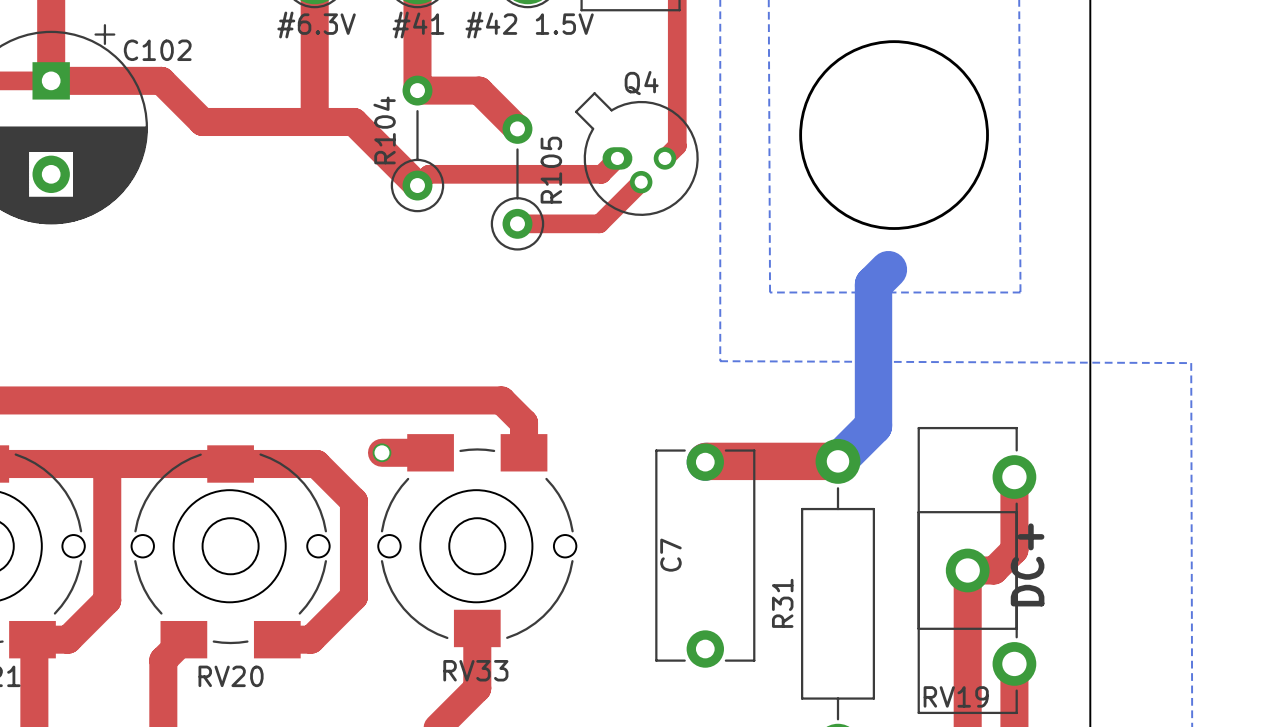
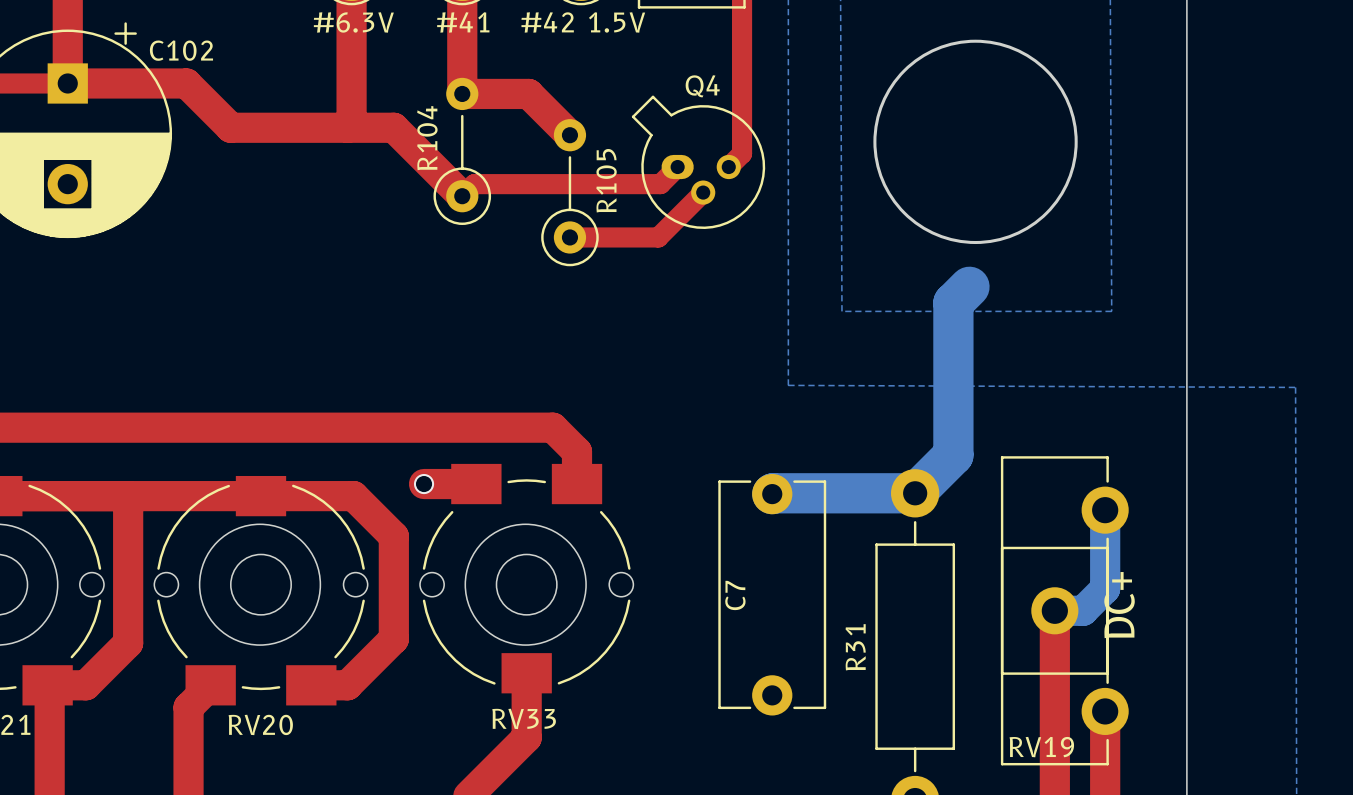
top track: (706, 461) (838, 461) -> none
bottom track: none -> (773, 493) (915, 493)
top track: (1014, 477) (1014, 550) (993, 570) (967, 570) -> none
bottom track: none -> (1105, 510) (1105, 588) (1083, 610) (1054, 610)

